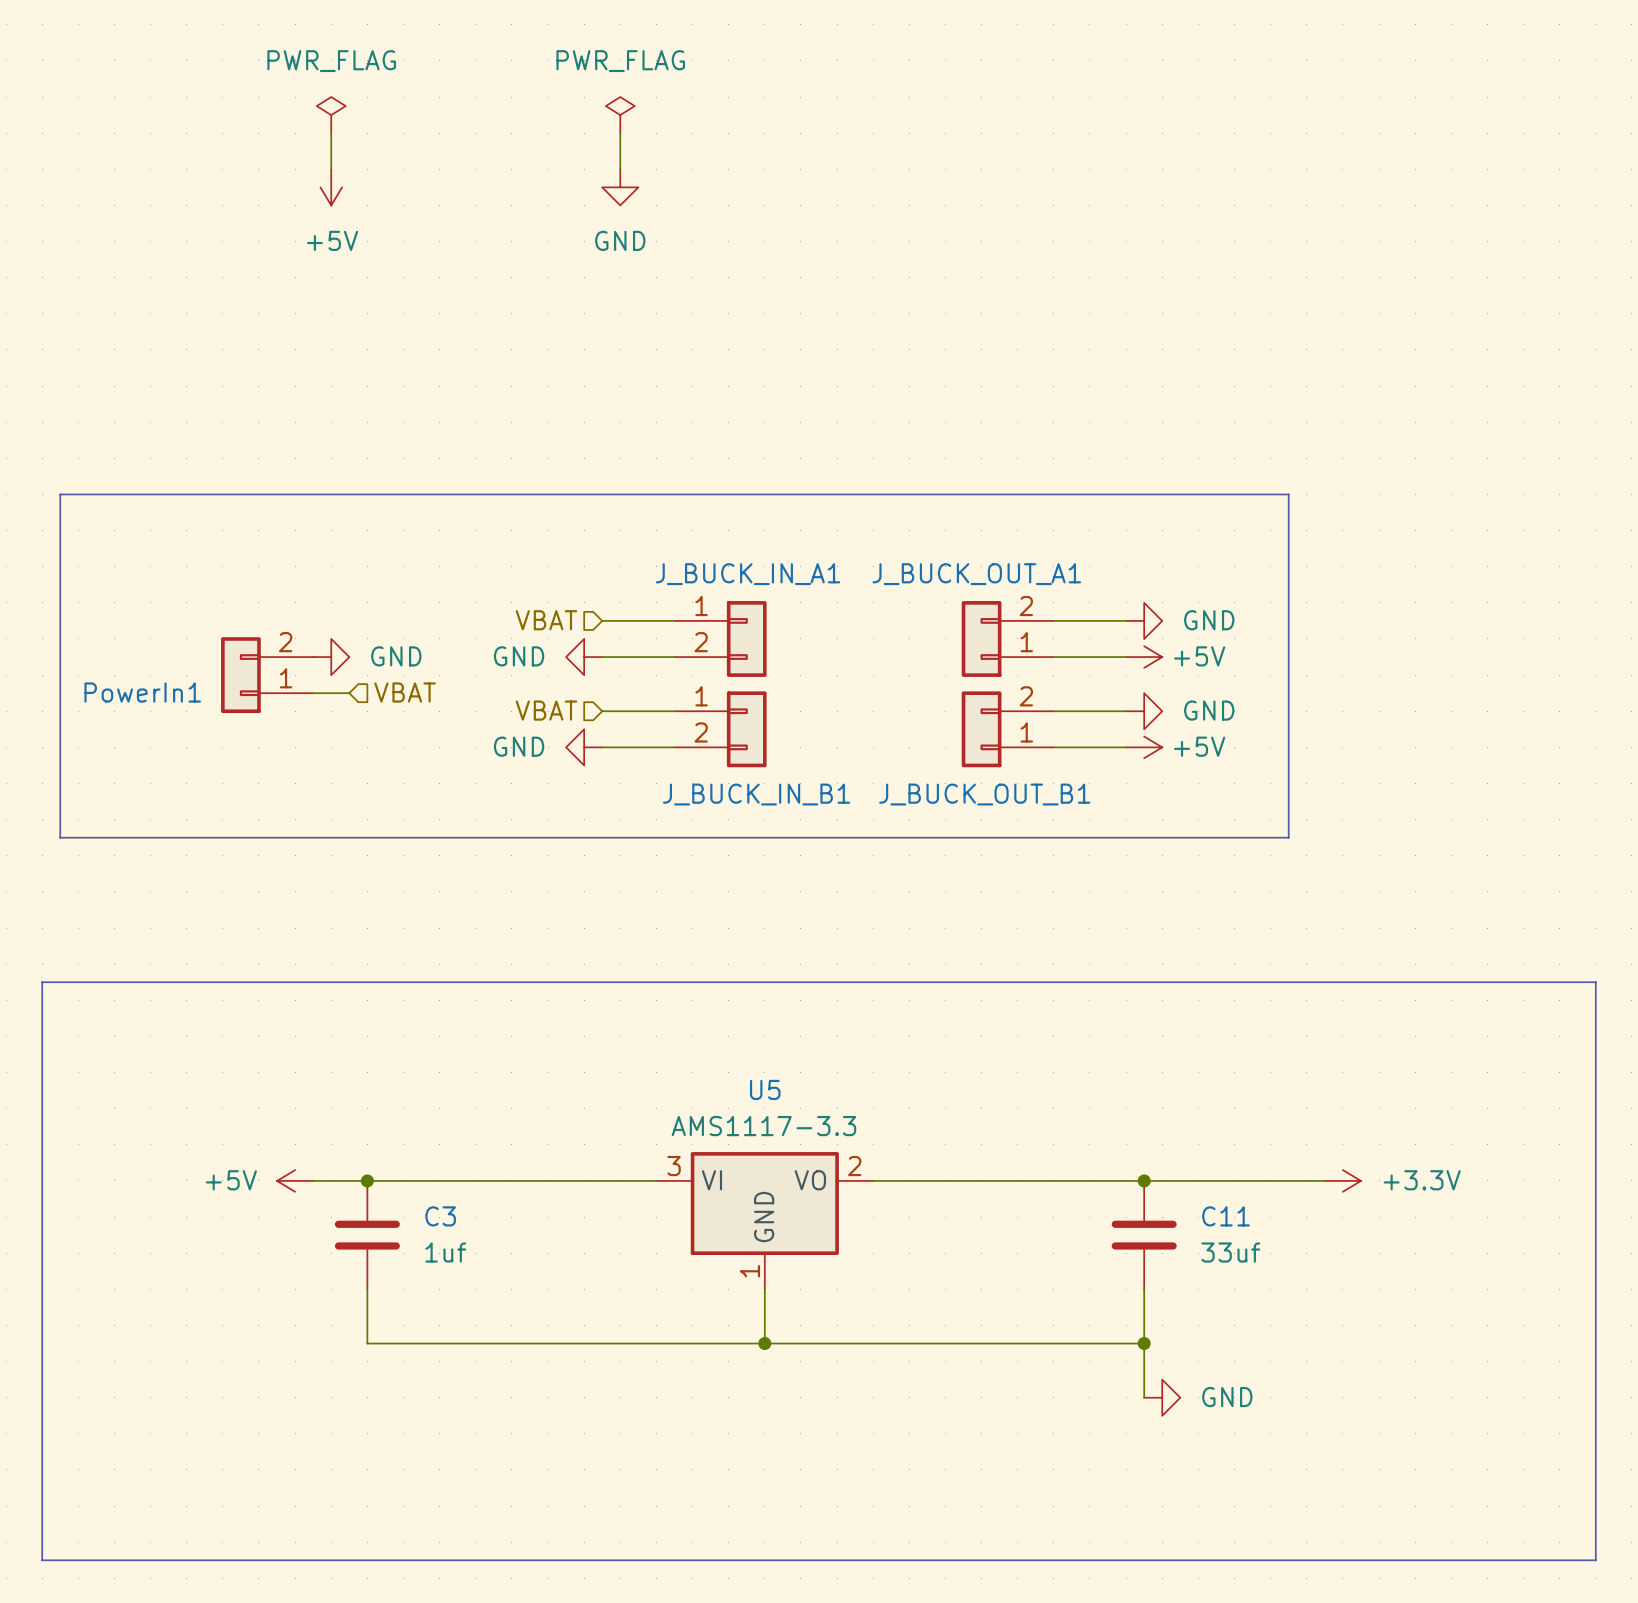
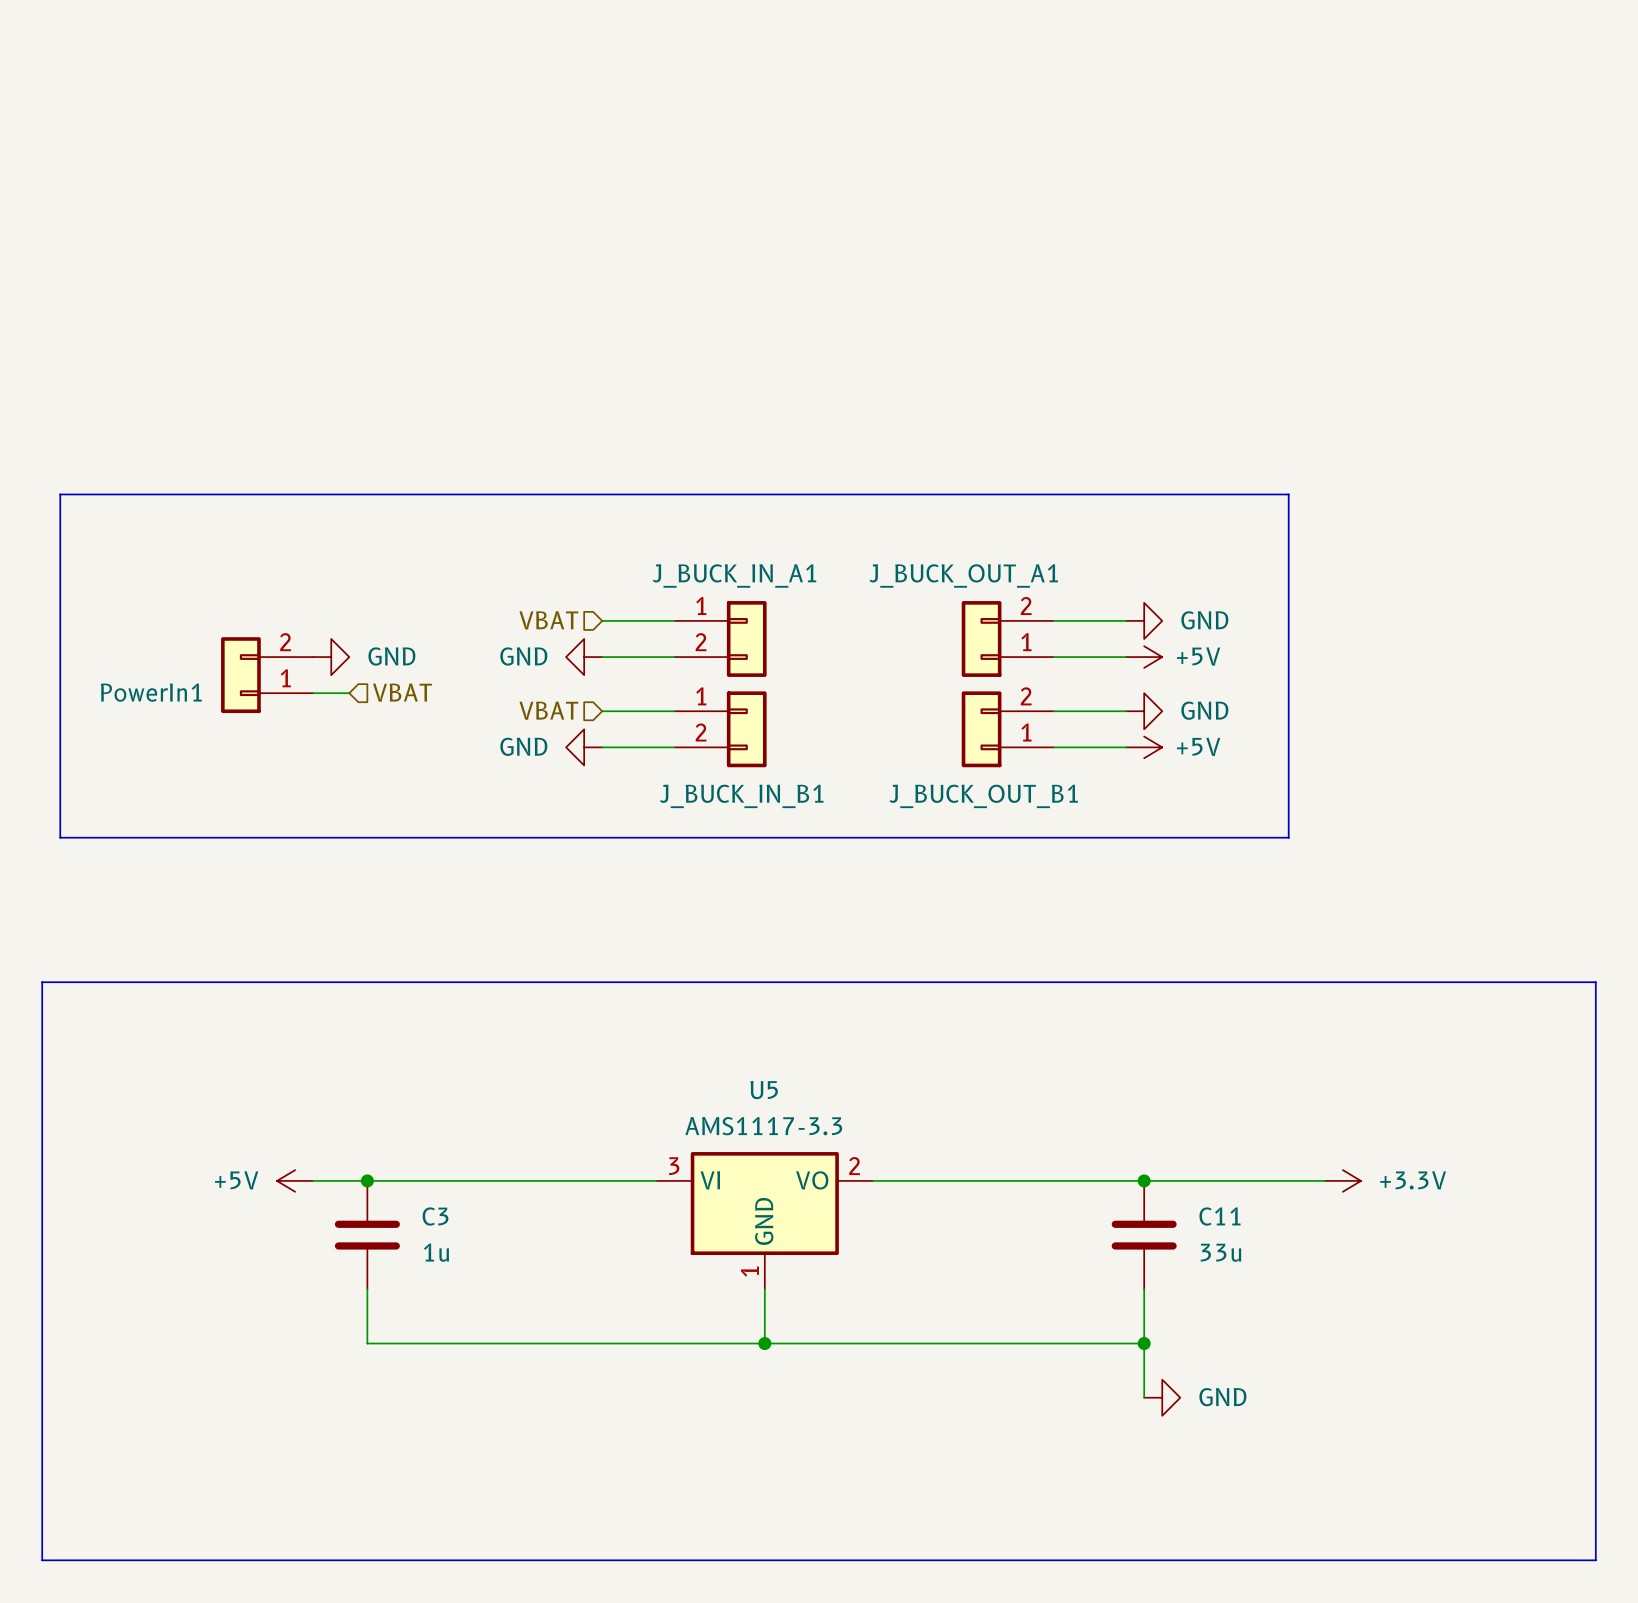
power symbol: PWR_FLAG (331, 115) -> none
power symbol: PWR_FLAG (620, 115) -> none
wire: (331, 133) (331, 169) -> none
wire: (620, 133) (620, 169) -> none
power symbol: +5V (331, 187) -> none
power symbol: GND (620, 187) -> none
C3 value: 1uf (445, 1252) -> 1u (436, 1252)
C11 value: 33uf (1230, 1252) -> 33u (1220, 1252)

